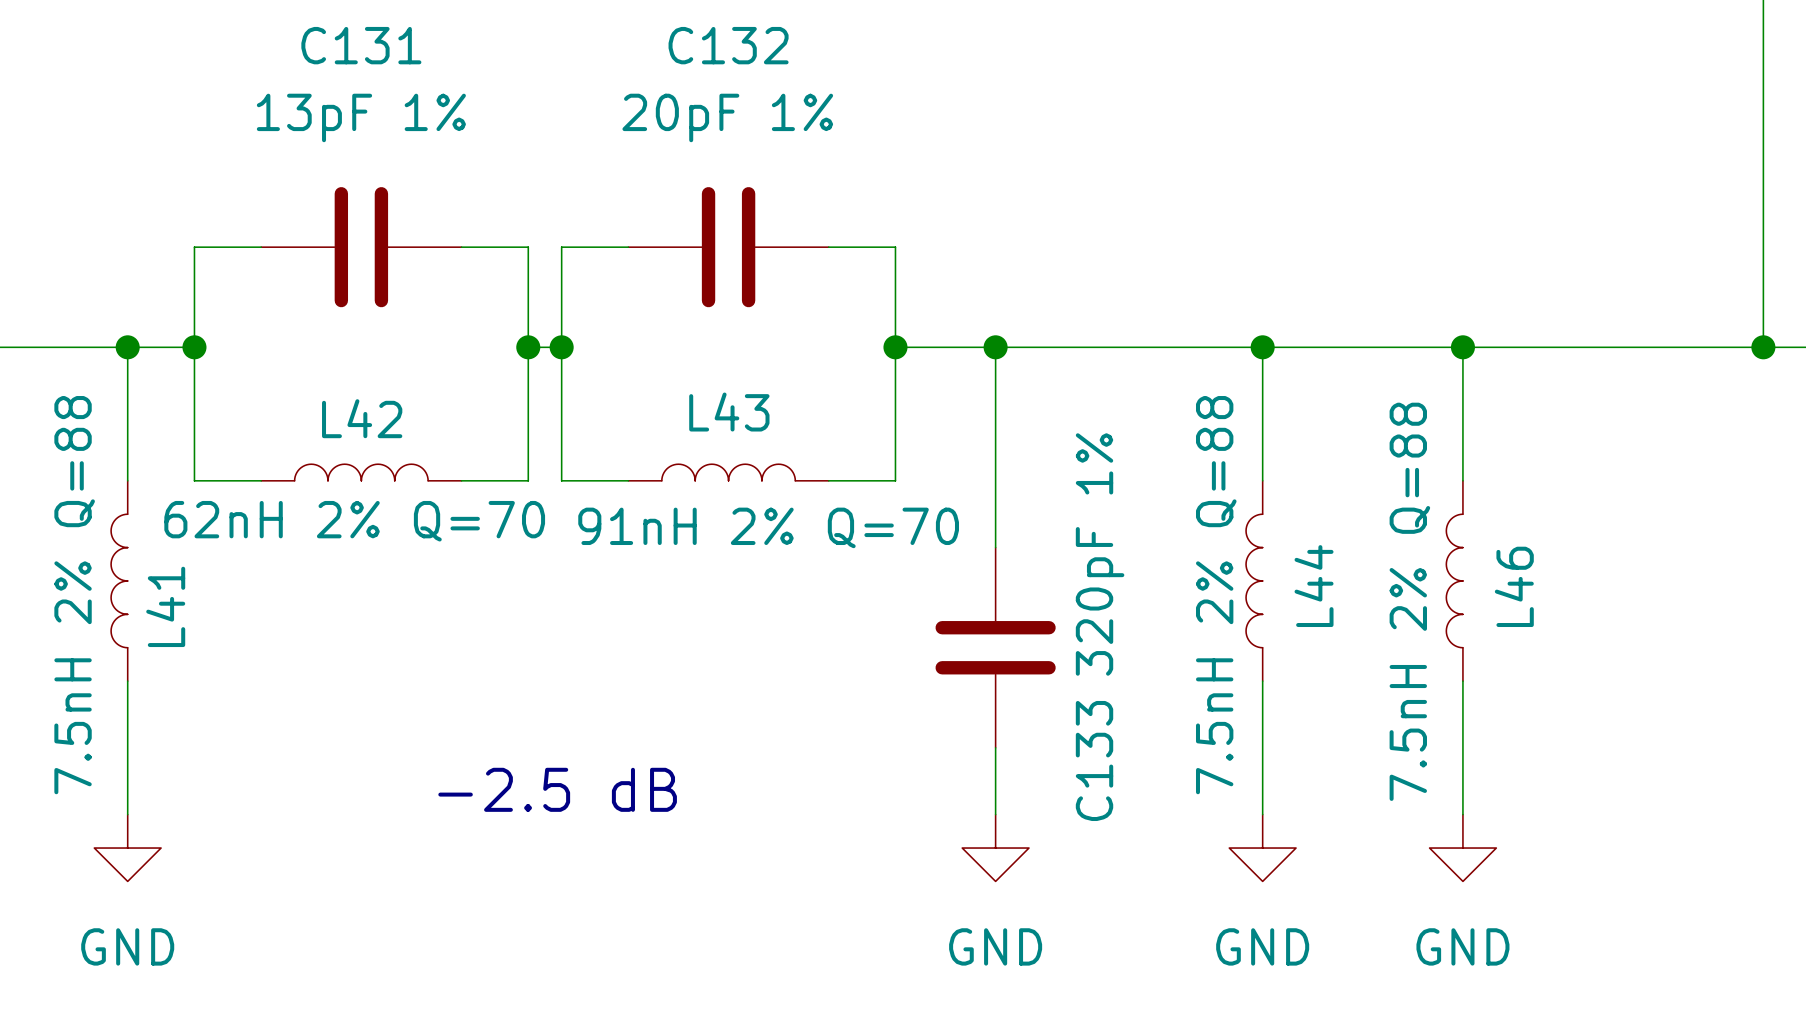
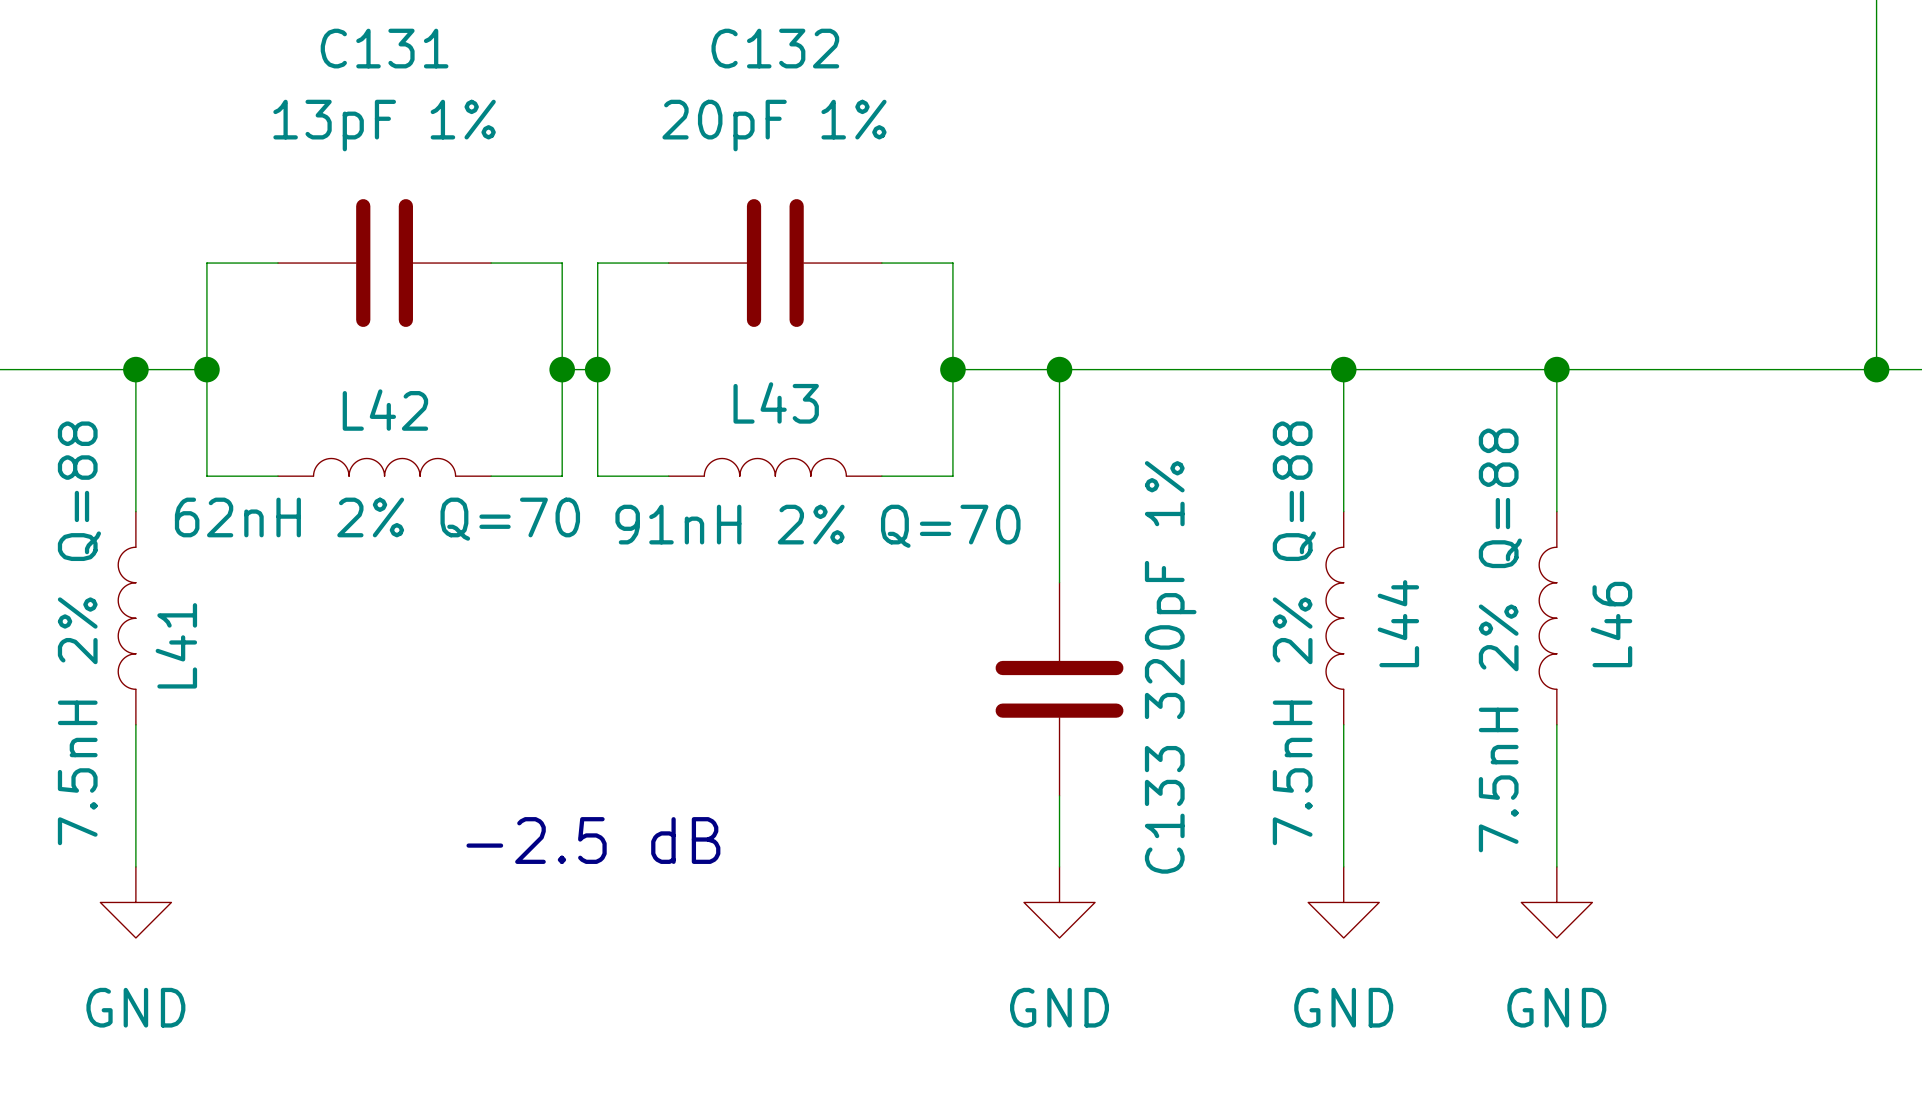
wire: (194, 447) (194, 480) (261, 480) -> (206, 476) (277, 476)
wire: (528, 447) (528, 480) (461, 480) -> (562, 476) (491, 476)
wire: (561, 447) (561, 480) (628, 480) -> (597, 476) (668, 476)
wire: (895, 447) (895, 480) (828, 480) -> (952, 476) (881, 476)
L42 position: (361, 472) -> (384, 467)
L43 position: (728, 472) -> (775, 467)

